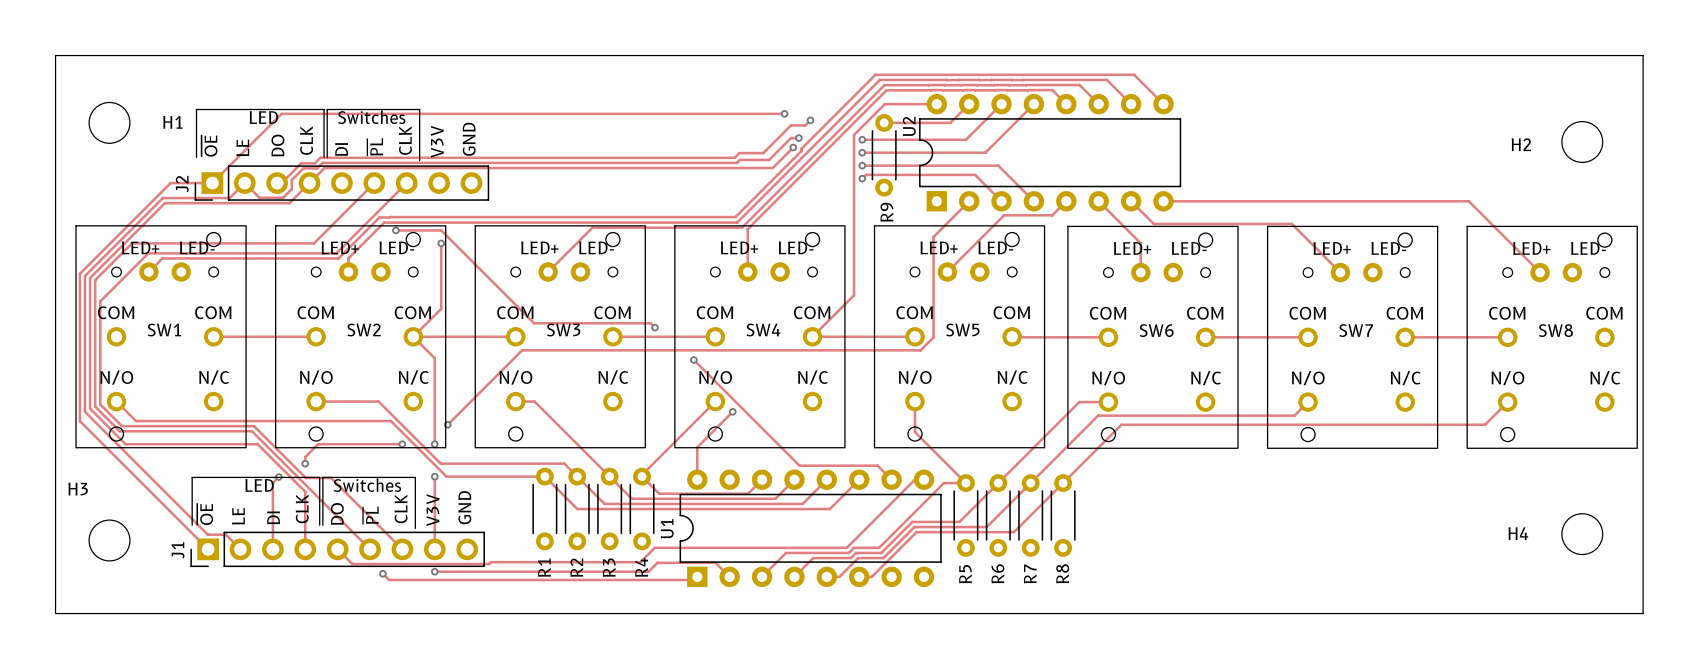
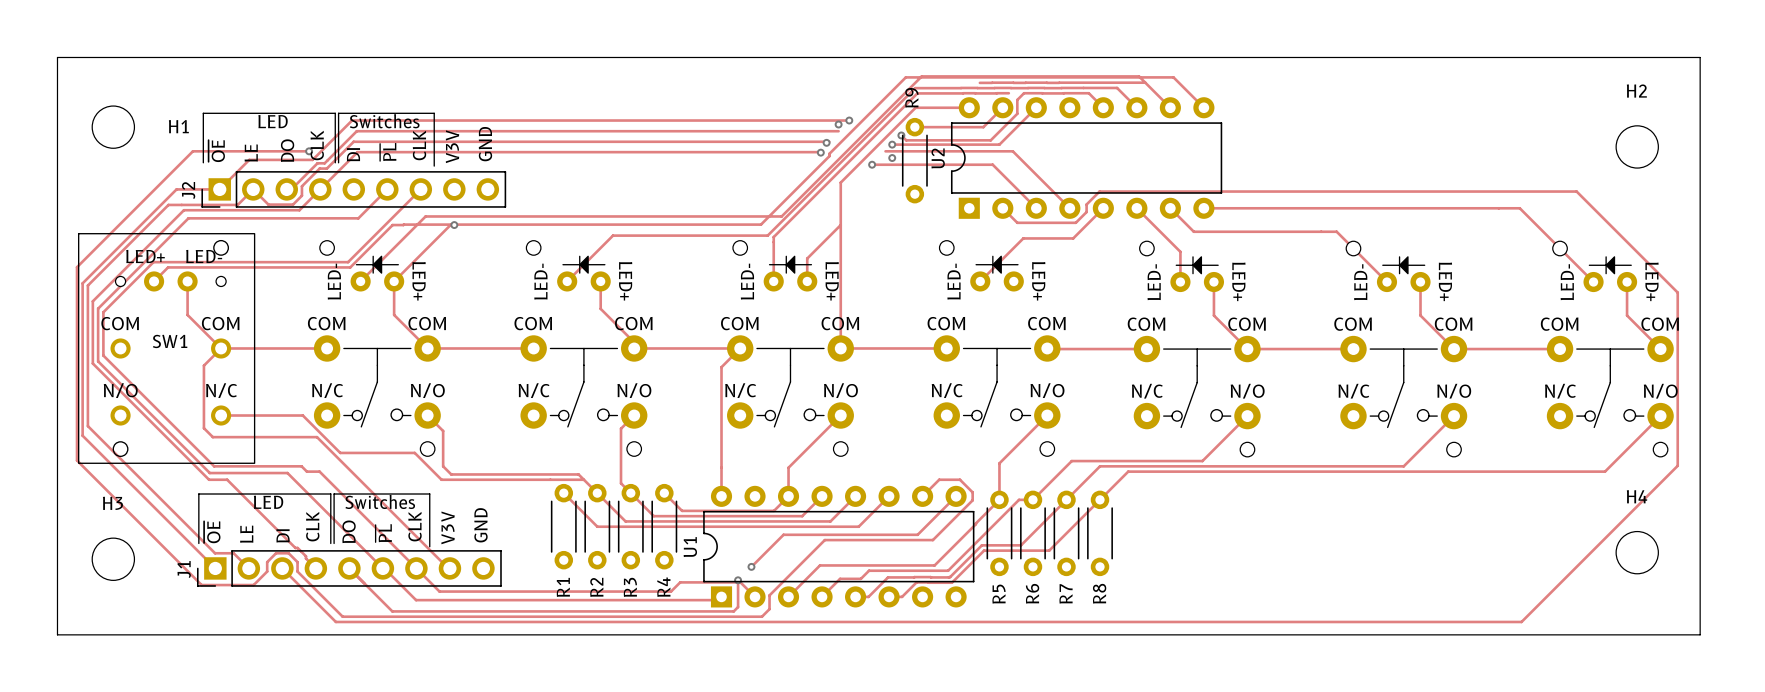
track: (946, 79) (879, 79) (737, 222) (384, 222) (348, 258) (348, 272) -> (1145, 82) (1139, 76) (921, 76) (781, 216) (425, 216) (360, 281)
track: (975, 90) (995, 90) -> (901, 135) (906, 140) (990, 140) (1017, 113) (1017, 99) (1024, 93) (1030, 93)
track: (1033, 104) (985, 152) (862, 152) -> none
track: (784, 113) (281, 113) (240, 154) -> (849, 120) (352, 120) (312, 159) (249, 159)
via: (784, 113) -> none
via: none -> (849, 120)
track: (810, 120) (805, 125) (791, 125) (763, 153) (739, 153) (734, 157) (320, 157) (314, 163) (301, 163) -> (838, 131) (356, 131) (324, 163) (317, 163) (311, 168)
U2 name position: U2 (909, 126) -> U2 (938, 158)
via: none -> (901, 135)
track: (853, 135) (853, 295) (812, 336) -> (883, 139) (840, 182) (840, 348)
track: (798, 138) (791, 138) (769, 159) (739, 159) (736, 162) (322, 162) (316, 168) (303, 168) -> (829, 141) (353, 141) (326, 168) (319, 168) (314, 174)
H2 name position: H2 (1521, 144) -> H2 (1636, 91)
via: none -> (309, 151)
track: (793, 147) (772, 168) (324, 168) -> (818, 152) (357, 152) (335, 173)
via: none -> (872, 164)
track: (862, 165) (998, 165) -> (885, 151) (1012, 151) (1032, 171)
via: (862, 165) -> none
track: (975, 174) (866, 174) (862, 178) -> (1009, 180) (992, 164) (872, 164)
via: (862, 178) -> none
track: (969, 201) (933, 236) (933, 337) (920, 350) (522, 350) (447, 424) -> none
track: (177, 203) (164, 203) (90, 278) (90, 408) (125, 444) (257, 444) (305, 491) (305, 549) -> (183, 210) (92, 301) (92, 363) (209, 479) (227, 479) (295, 547) (297, 547) (315, 568)
track: (346, 211) (313, 243) (131, 243) (95, 280) (95, 406) (119, 431) (251, 431) (277, 457) -> (358, 218) (188, 218) (98, 308) (98, 361) (209, 473) (287, 473)
R9 name position: R9 (886, 212) -> R9 (911, 97)
track: (1004, 215) (988, 230) -> (1038, 222) (1017, 222) (1002, 208)
track: (1039, 215) (1052, 215) -> (1023, 238) (1073, 238) (1088, 222)
track: none -> (454, 225) (450, 225) (394, 281) (394, 314) (427, 348)
via: none -> (454, 225)
track: none -> (840, 225) (807, 258) (807, 281)
track: (395, 230) (441, 230) (534, 323) (650, 323) (655, 327) -> none
via: (395, 230) -> none
track: (441, 243) (441, 308) (413, 336) (434, 358) (434, 444) -> none
via: (441, 243) -> none
track: none -> (600, 281) (600, 308) (634, 342)
track: none -> (1213, 282) (1213, 315) (1247, 349)
track: none -> (1420, 282) (1420, 315) (1454, 349)
track: none -> (1627, 282) (1627, 315) (1660, 349)
track: (100, 301) (100, 404) (121, 426) (254, 426) (305, 477) (331, 477) -> (103, 311) (103, 355) (214, 466) (301, 466) (306, 471) (319, 471) (342, 494)
via: (655, 327) -> none
SW2: (360, 336) -> none
part: none -> (377, 348)
SW3: (560, 336) -> none
part: none -> (583, 348)
SW4: (759, 336) -> none
part: none -> (790, 348)
SW5: (959, 336) -> none
part: none -> (997, 348)
SW6: (1152, 337) -> none
part: none -> (1197, 349)
SW7: (1352, 337) -> none
part: none -> (1403, 349)
SW8: (1552, 337) -> none
part: none -> (1610, 349)
track: (693, 360) (799, 465) (877, 465) (891, 479) -> (309, 151) (192, 151) (77, 267) (77, 460) (201, 585) (253, 585) (267, 571) (267, 562) (276, 553) (288, 553) (297, 562) (297, 571) (342, 616) (761, 616) (769, 609) (769, 595) (824, 540) (932, 540) (972, 500) (972, 492) (960, 479) (939, 479) (922, 496)
via: (693, 360) -> none
track: (116, 401) (136, 421) (390, 421) (446, 476) (544, 476) -> none
track: (316, 401) (378, 401) (440, 463) -> (221, 415) (302, 415) (340, 452) (414, 452) (441, 479) (456, 479)
track: none -> (427, 415) (443, 431) (443, 466) (451, 474) (578, 474) (583, 479)
track: (515, 401) (534, 401) (600, 467) -> (634, 415) (621, 428) (621, 483)
track: (715, 401) (642, 476) -> none
track: none -> (840, 415) (788, 467) (788, 496)
track: (915, 401) (915, 432) (965, 483) (943, 483) (879, 547) (853, 547) (848, 552) (785, 552) -> (1047, 415) (999, 463) (999, 499) (934, 565) (819, 565) (813, 572)
track: (1108, 402) (1079, 402) (1035, 445) -> (1247, 416) (1202, 461) (1071, 461)
track: (1308, 402) (1294, 415) (1098, 415) (1063, 450) -> (1454, 416) (1403, 466) (1100, 466)
track: (1507, 402) (1485, 424) (1121, 424) (1090, 455) -> (1660, 416) (1605, 471) (1128, 471)
track: (732, 411) (697, 447) -> (740, 348) (721, 367) (721, 462)
via: (732, 411) -> none
via: (447, 424) -> none
track: (402, 444) (318, 444) (305, 457) (305, 463) -> none
via: (402, 444) -> none
via: (434, 444) -> none
via: (305, 463) -> none
track: (434, 476) (434, 549) -> (187, 281) (187, 314) (221, 348) (203, 365) (203, 428) (212, 437) (317, 437) (449, 568)
via: (434, 476) -> none
track: (278, 477) (272, 483) (272, 549) -> (1075, 222) (1086, 212) (1086, 204) (1099, 191) (1576, 191) (1677, 292) (1677, 465) (1521, 621) (335, 621) (282, 568)
via: (278, 477) -> none
track: (924, 479) (914, 479) (846, 547) (654, 547) (640, 562) (352, 564) -> (738, 580) (738, 607) (733, 611) (392, 611) (364, 583)
track: none -> (956, 496) (917, 534) (783, 534) (751, 566)
track: (998, 483) (959, 521) (912, 521) (881, 552) (856, 552) (851, 558) (811, 559) -> (1032, 499) (1019, 499) (948, 570) (869, 570) (860, 578) (840, 578)
H3 name position: H3 (78, 489) -> H3 (112, 503)
track: (948, 527) (914, 527) (883, 557) -> (981, 545) (950, 577) (914, 577)
track: (951, 532) (916, 532) (885, 562) -> (984, 550) (951, 582) (916, 582)
H4 name position: H4 (1518, 533) -> H4 (1637, 496)
via: none -> (751, 566)
track: none -> (416, 568) (439, 591) (449, 591)
via: none -> (738, 580)
via: (434, 571) -> none
track: (382, 573) (389, 579) (402, 579) -> (382, 568) (416, 600)
via: (382, 573) -> none

